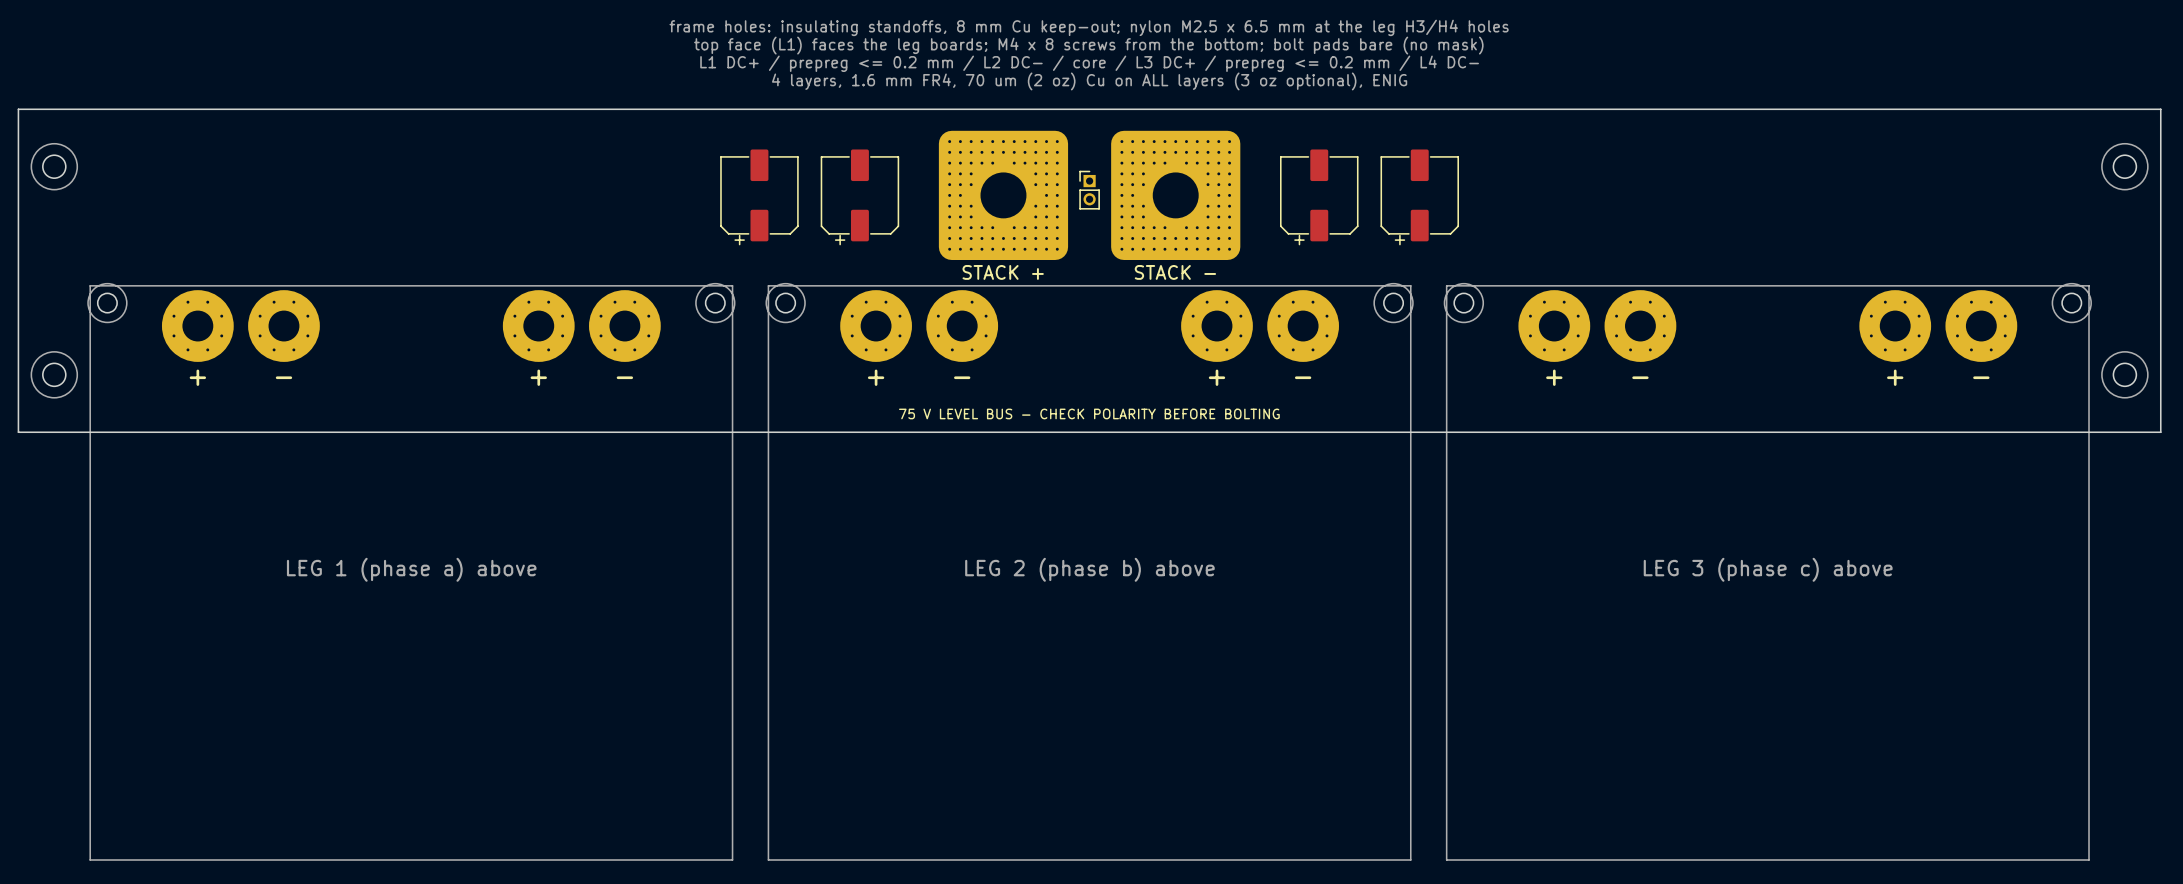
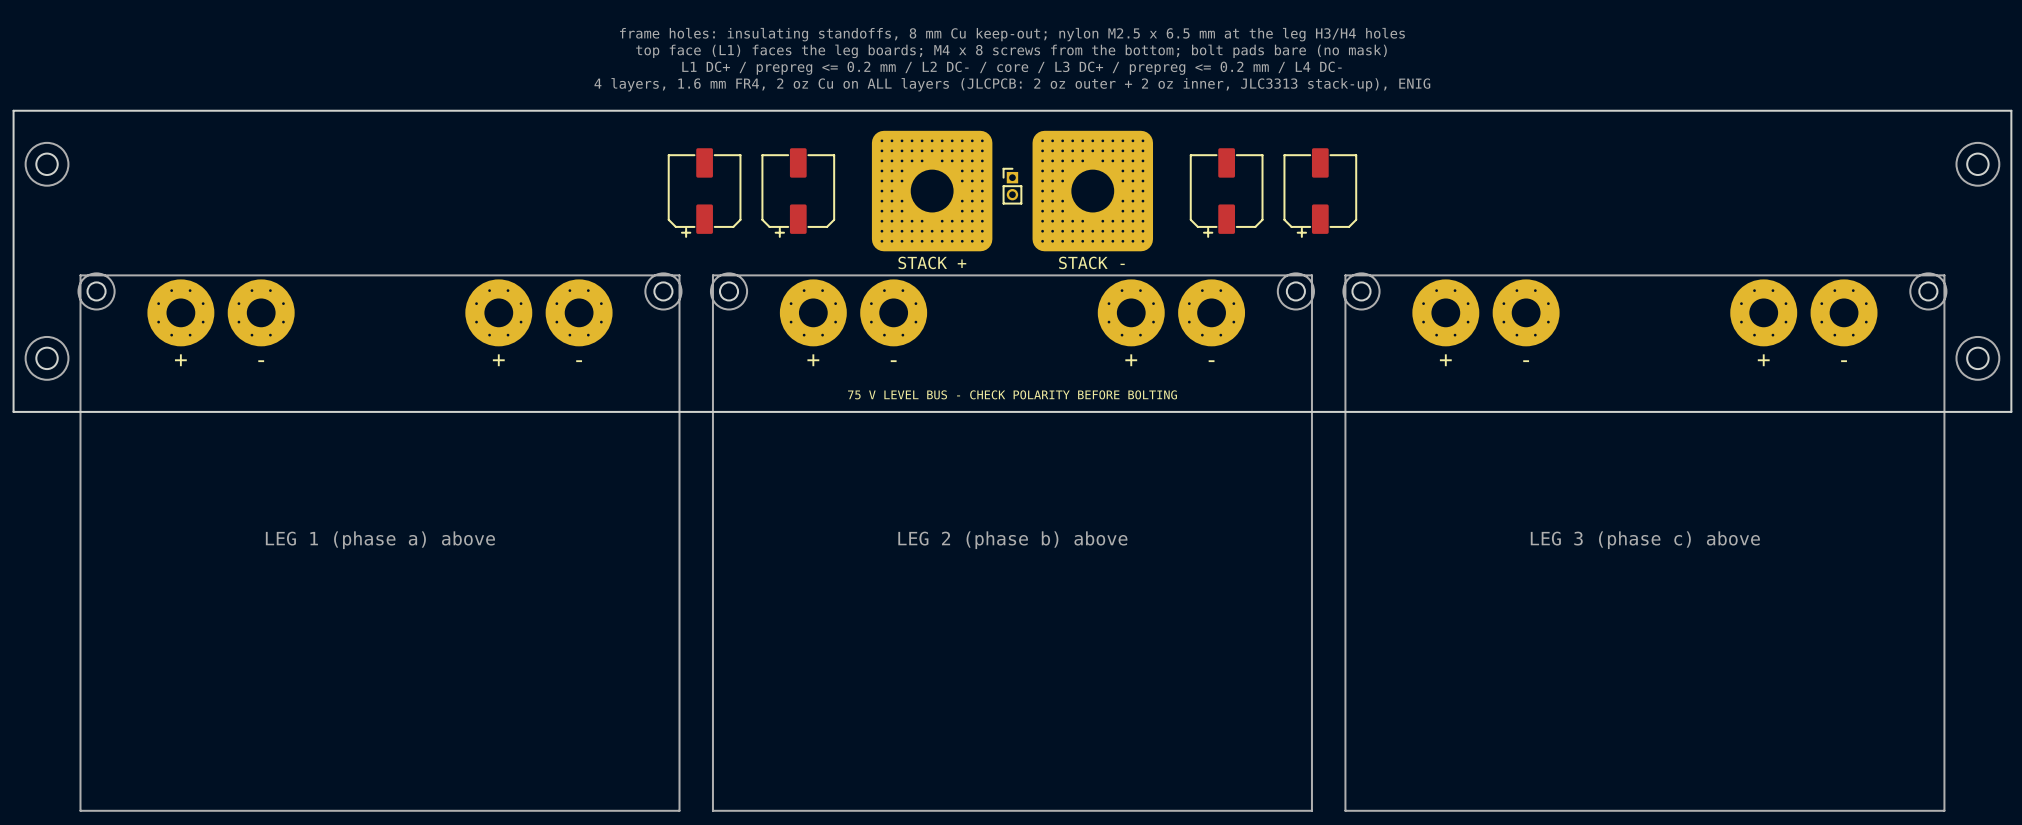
text: 4 layers, 1.6 mm FR4, 70 um (2 oz) Cu on ALL layers (3 oz optional), ENIG (1089, 81) -> 4 layers, 1.6 mm FR4, 2 oz Cu on ALL layers (JLCPCB: 2 oz outer + 2 oz inner, JLC3313 stack-up), ENIG (1012, 84)

